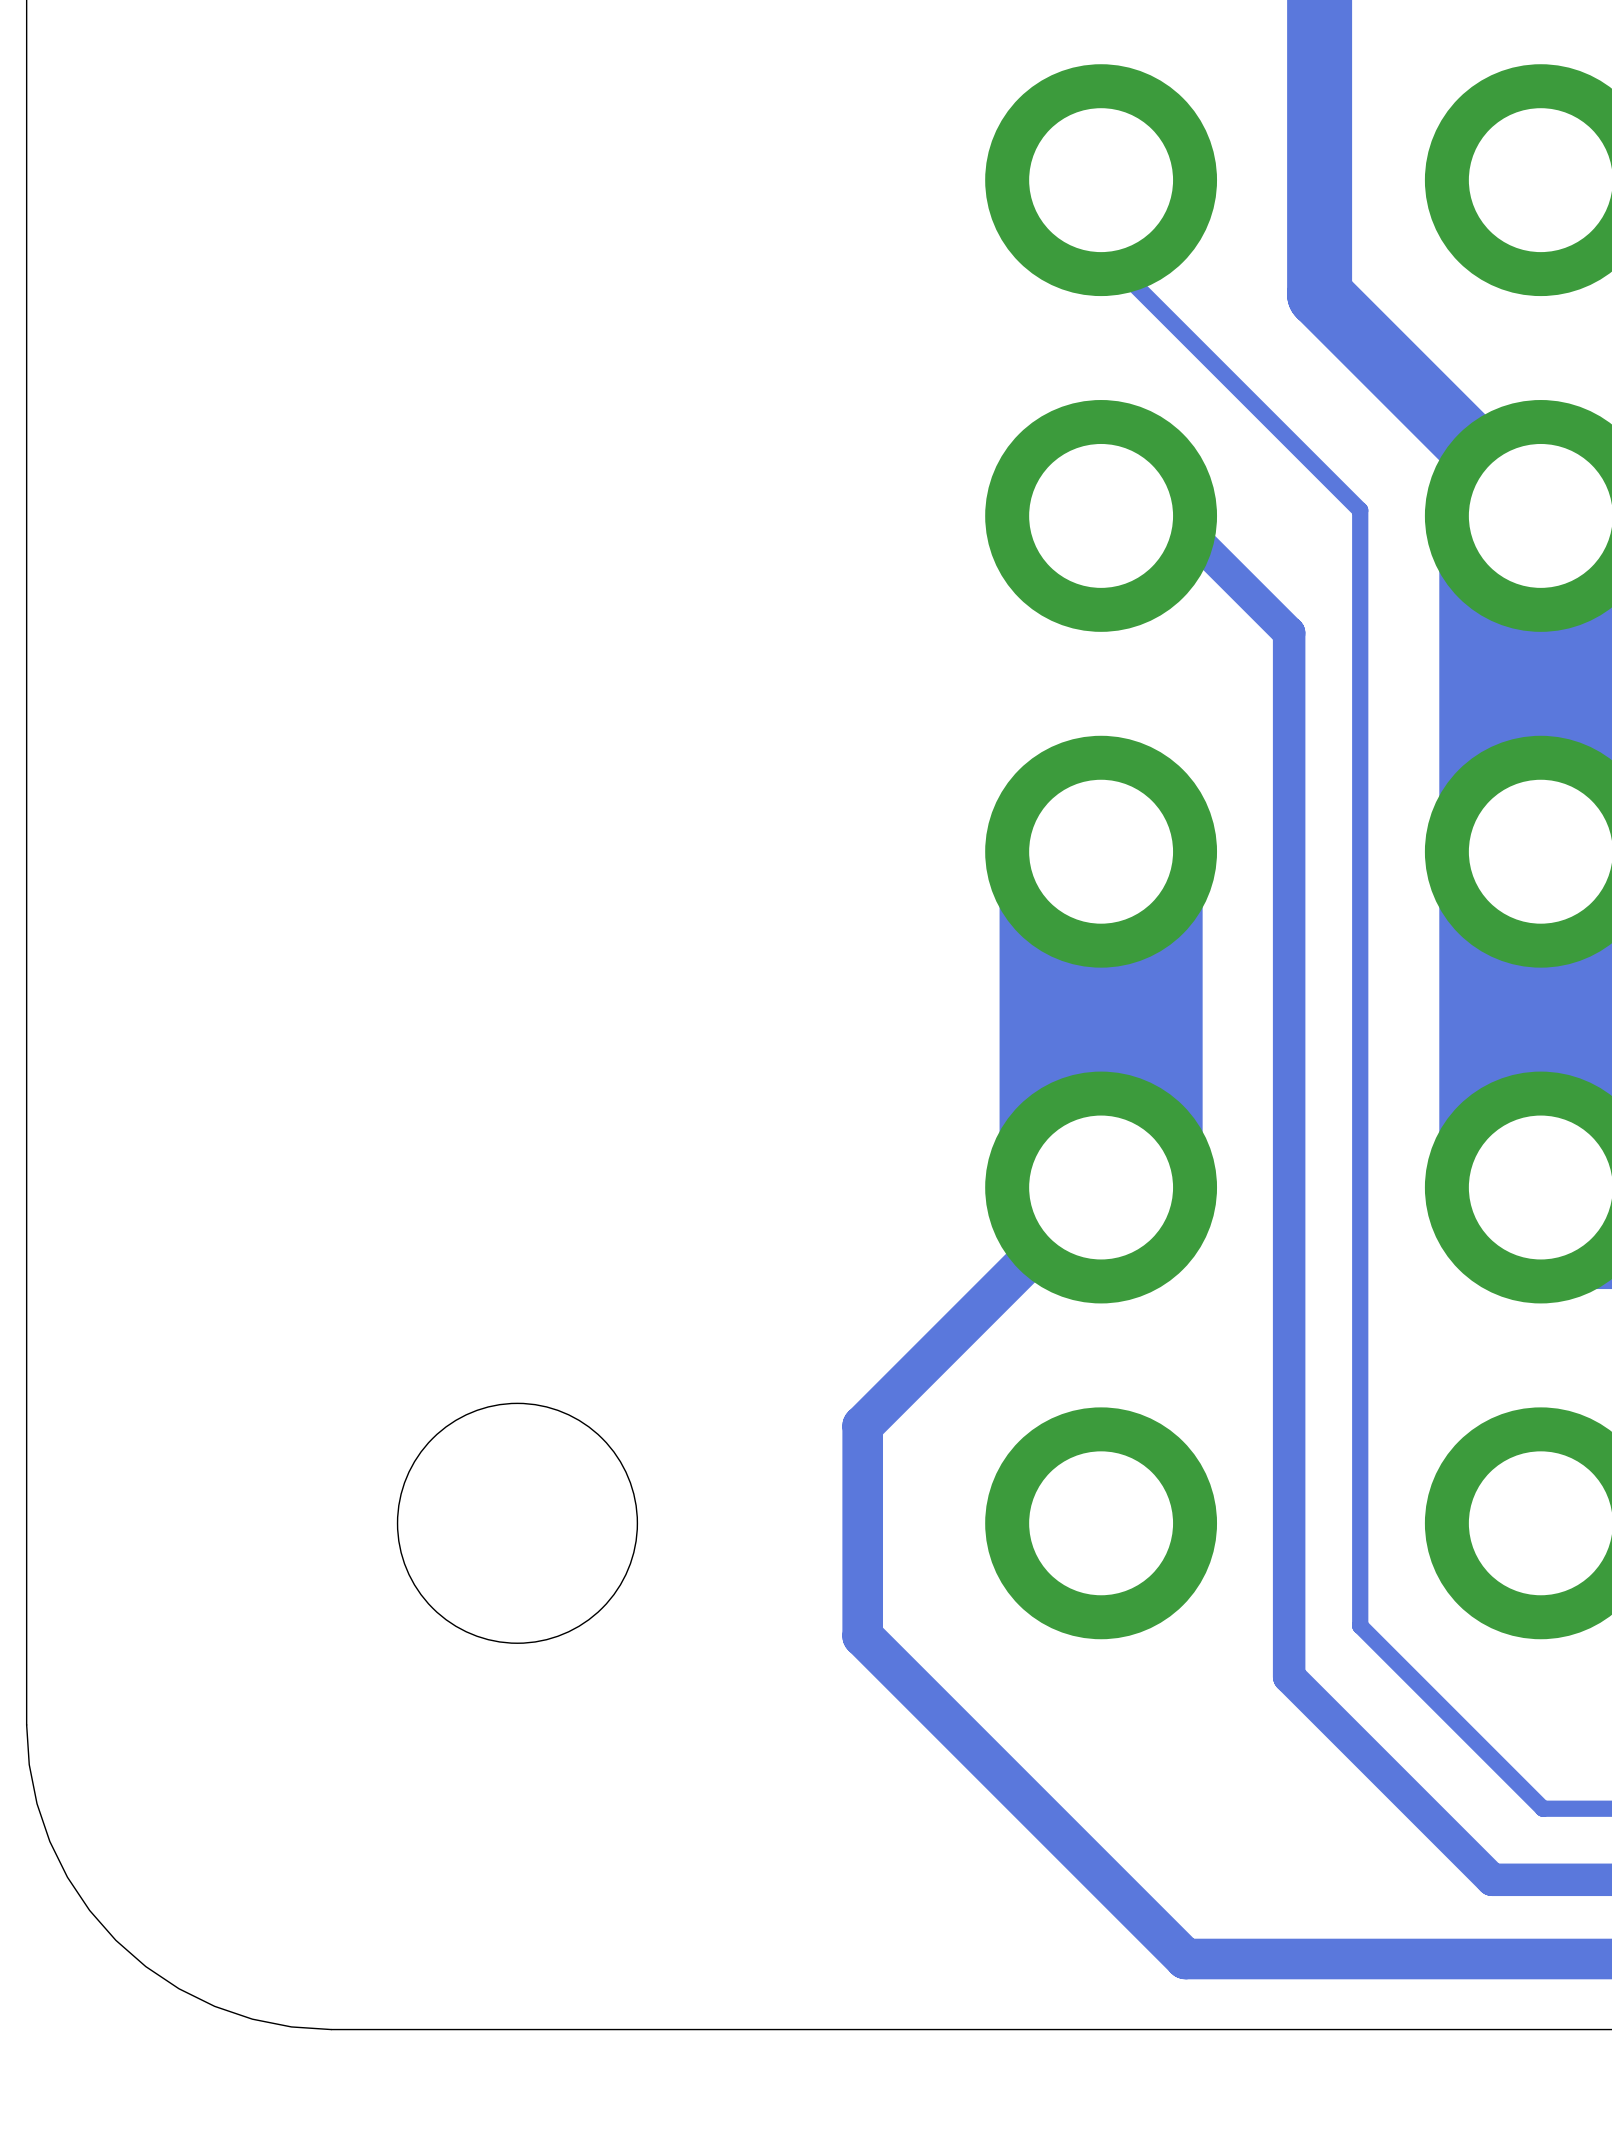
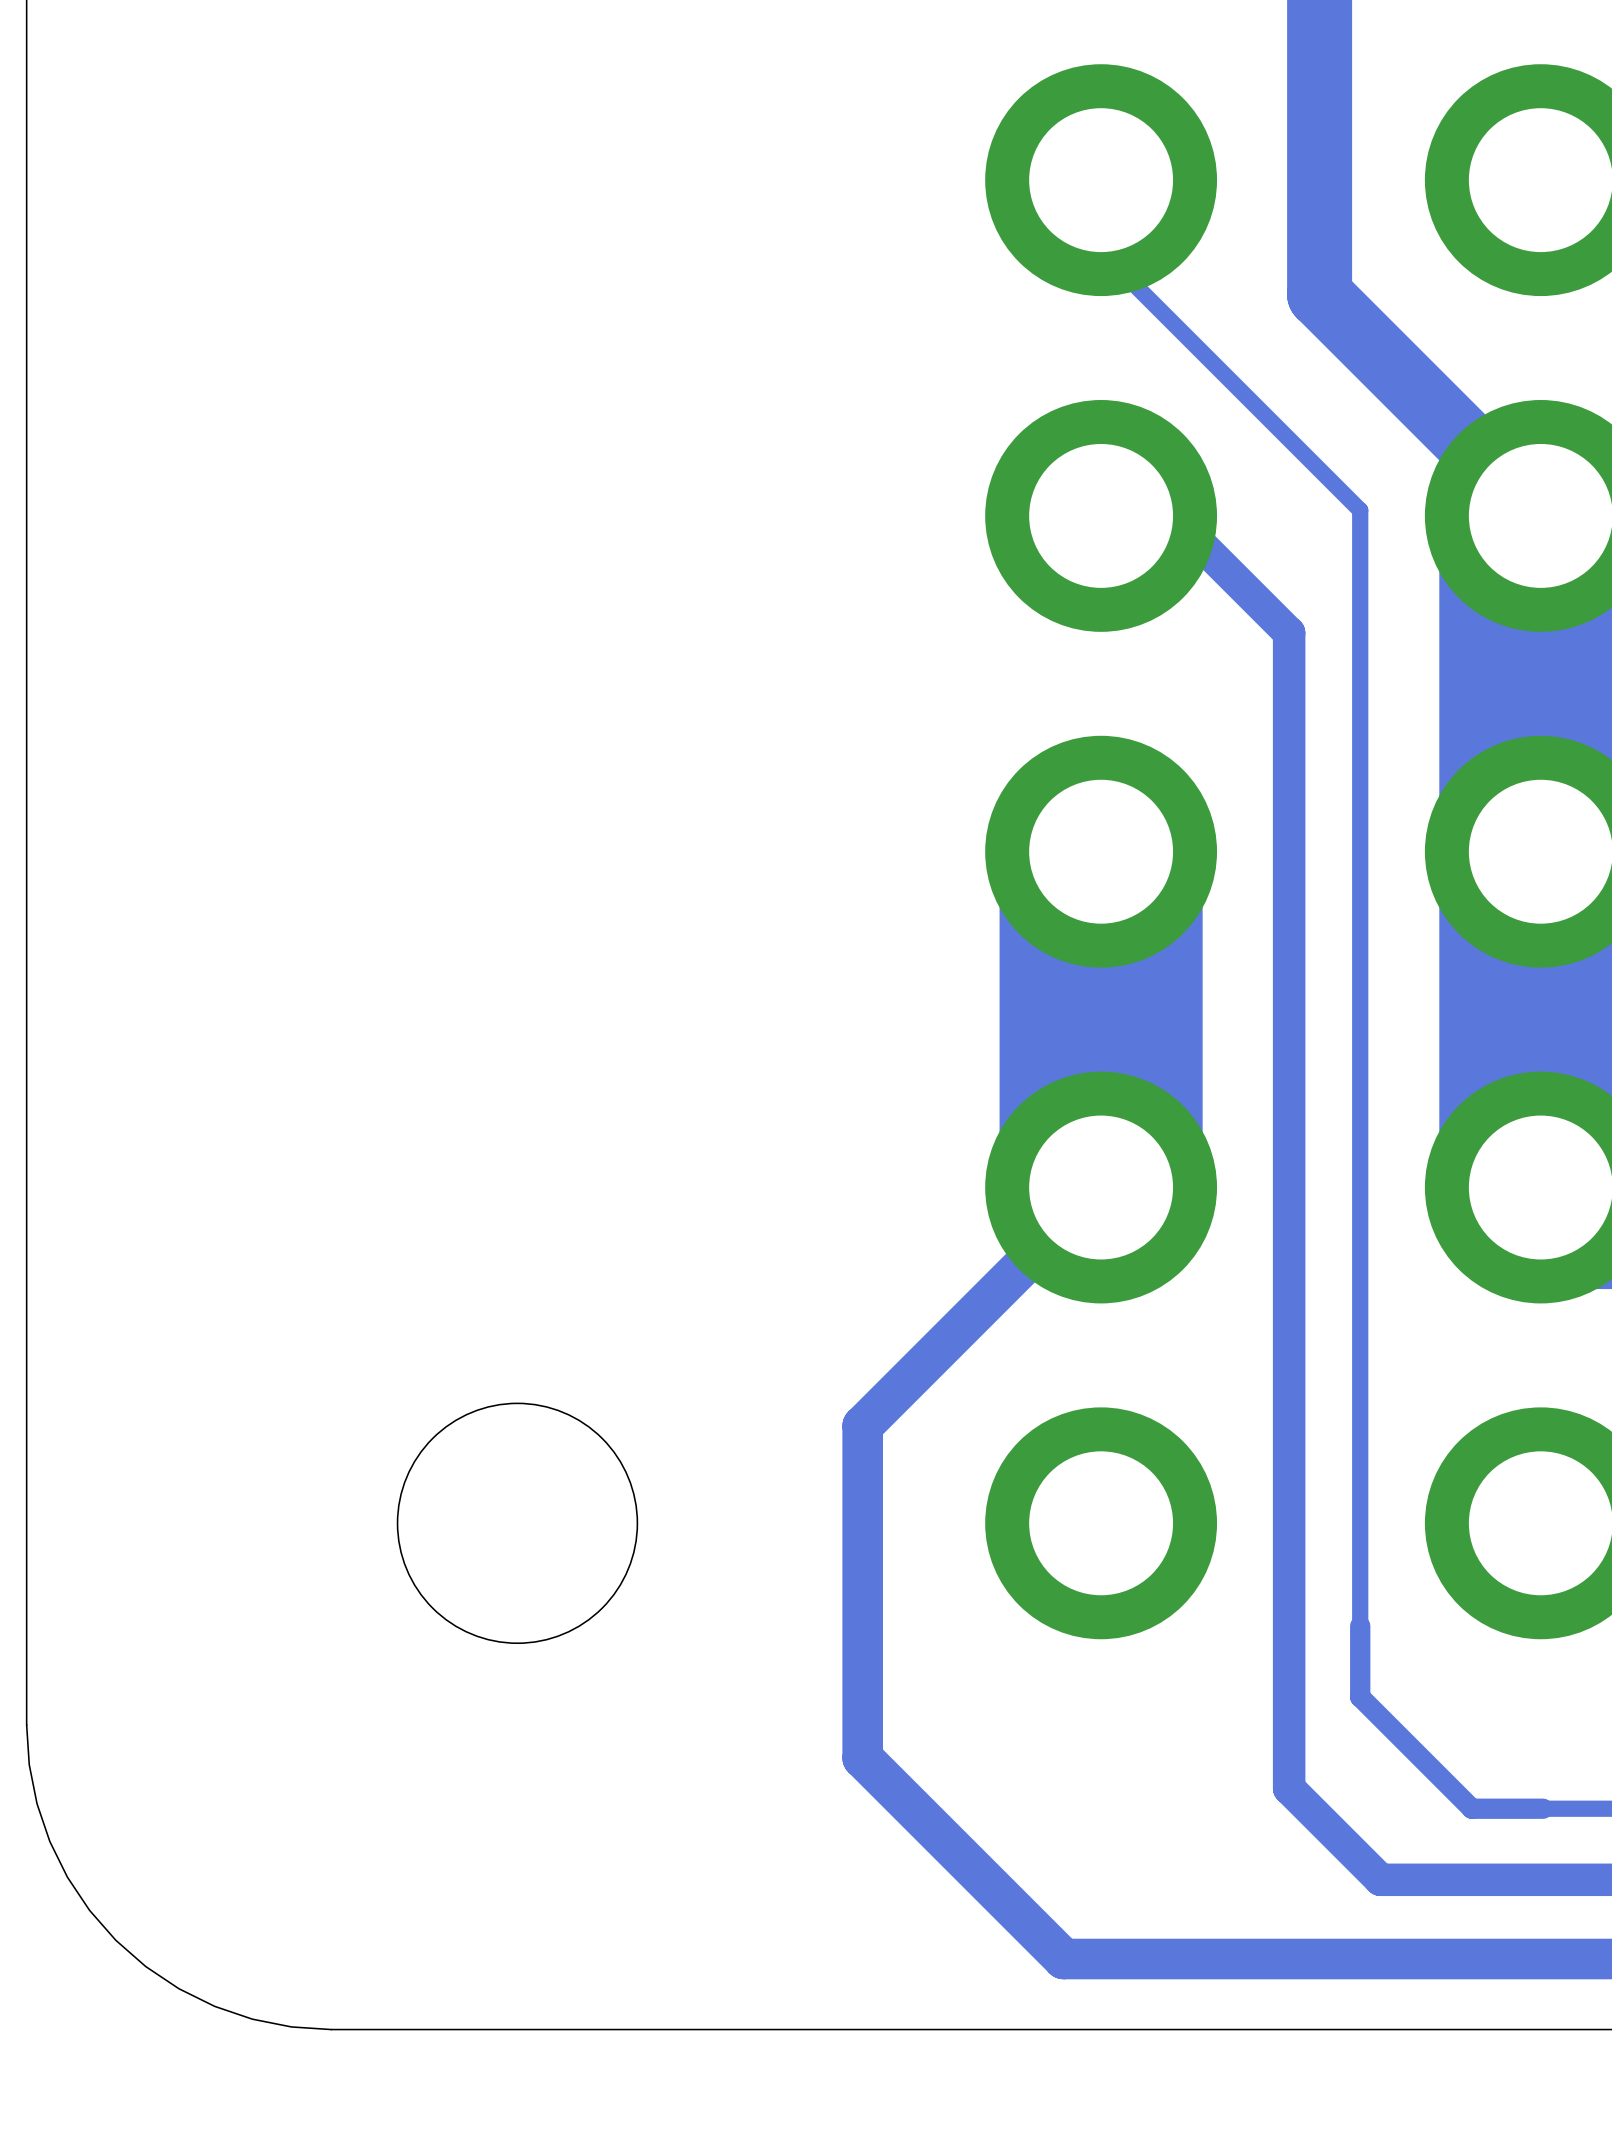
track: (1360, 1625) (1542, 1808) -> (1360, 1625) (1360, 1697) (1471, 1808) (1542, 1808)
track: (862, 1636) (1185, 1959) -> (862, 1636) (862, 1757) (1063, 1959) (1185, 1959)
track: (1289, 1676) (1492, 1879) -> (1289, 1676) (1289, 1788) (1380, 1879) (1492, 1879)

